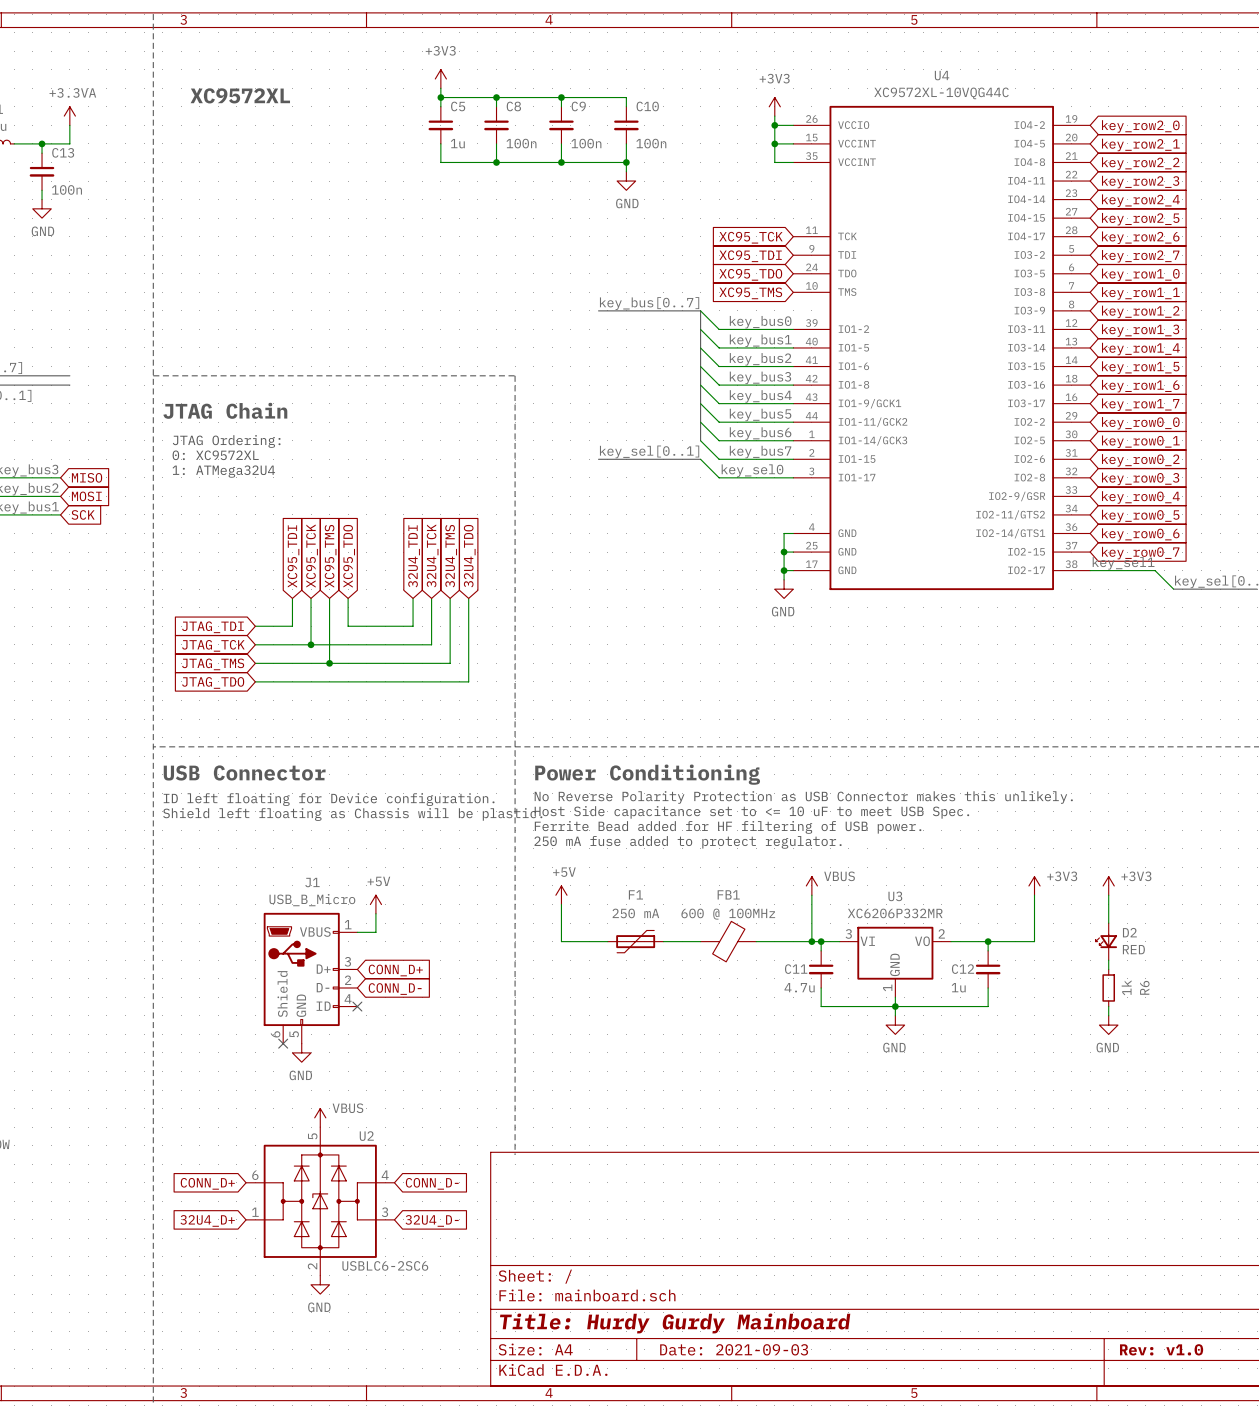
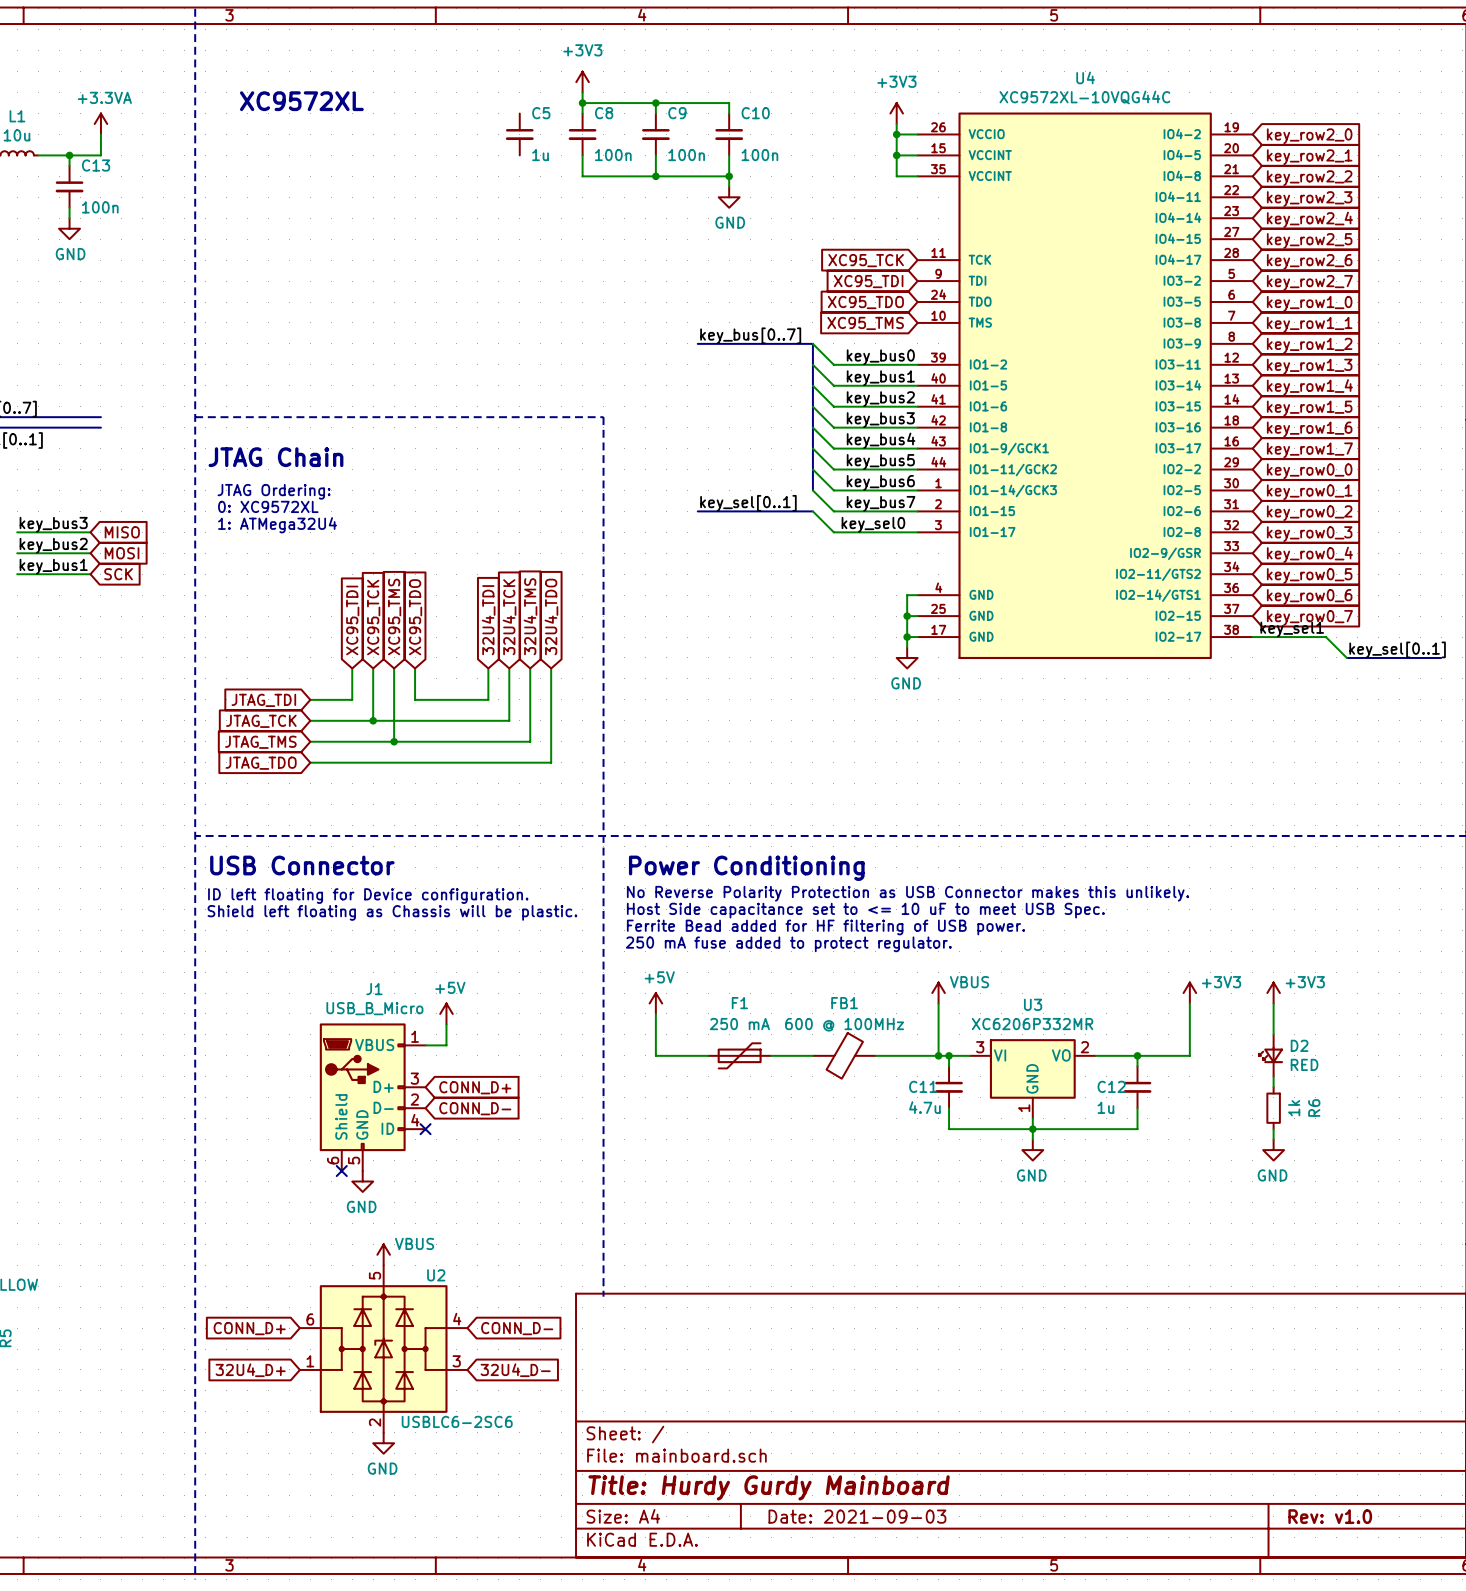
power symbol position: +3V3 (440, 78) -> +3V3 (582, 82)
wire: (440, 88) (440, 106) -> none
wire: (440, 97) (496, 97) -> (582, 92) (582, 103)
junction: (440, 97) -> none
wire: (440, 143) (440, 162) (496, 162) -> none
junction: (496, 162) -> none

